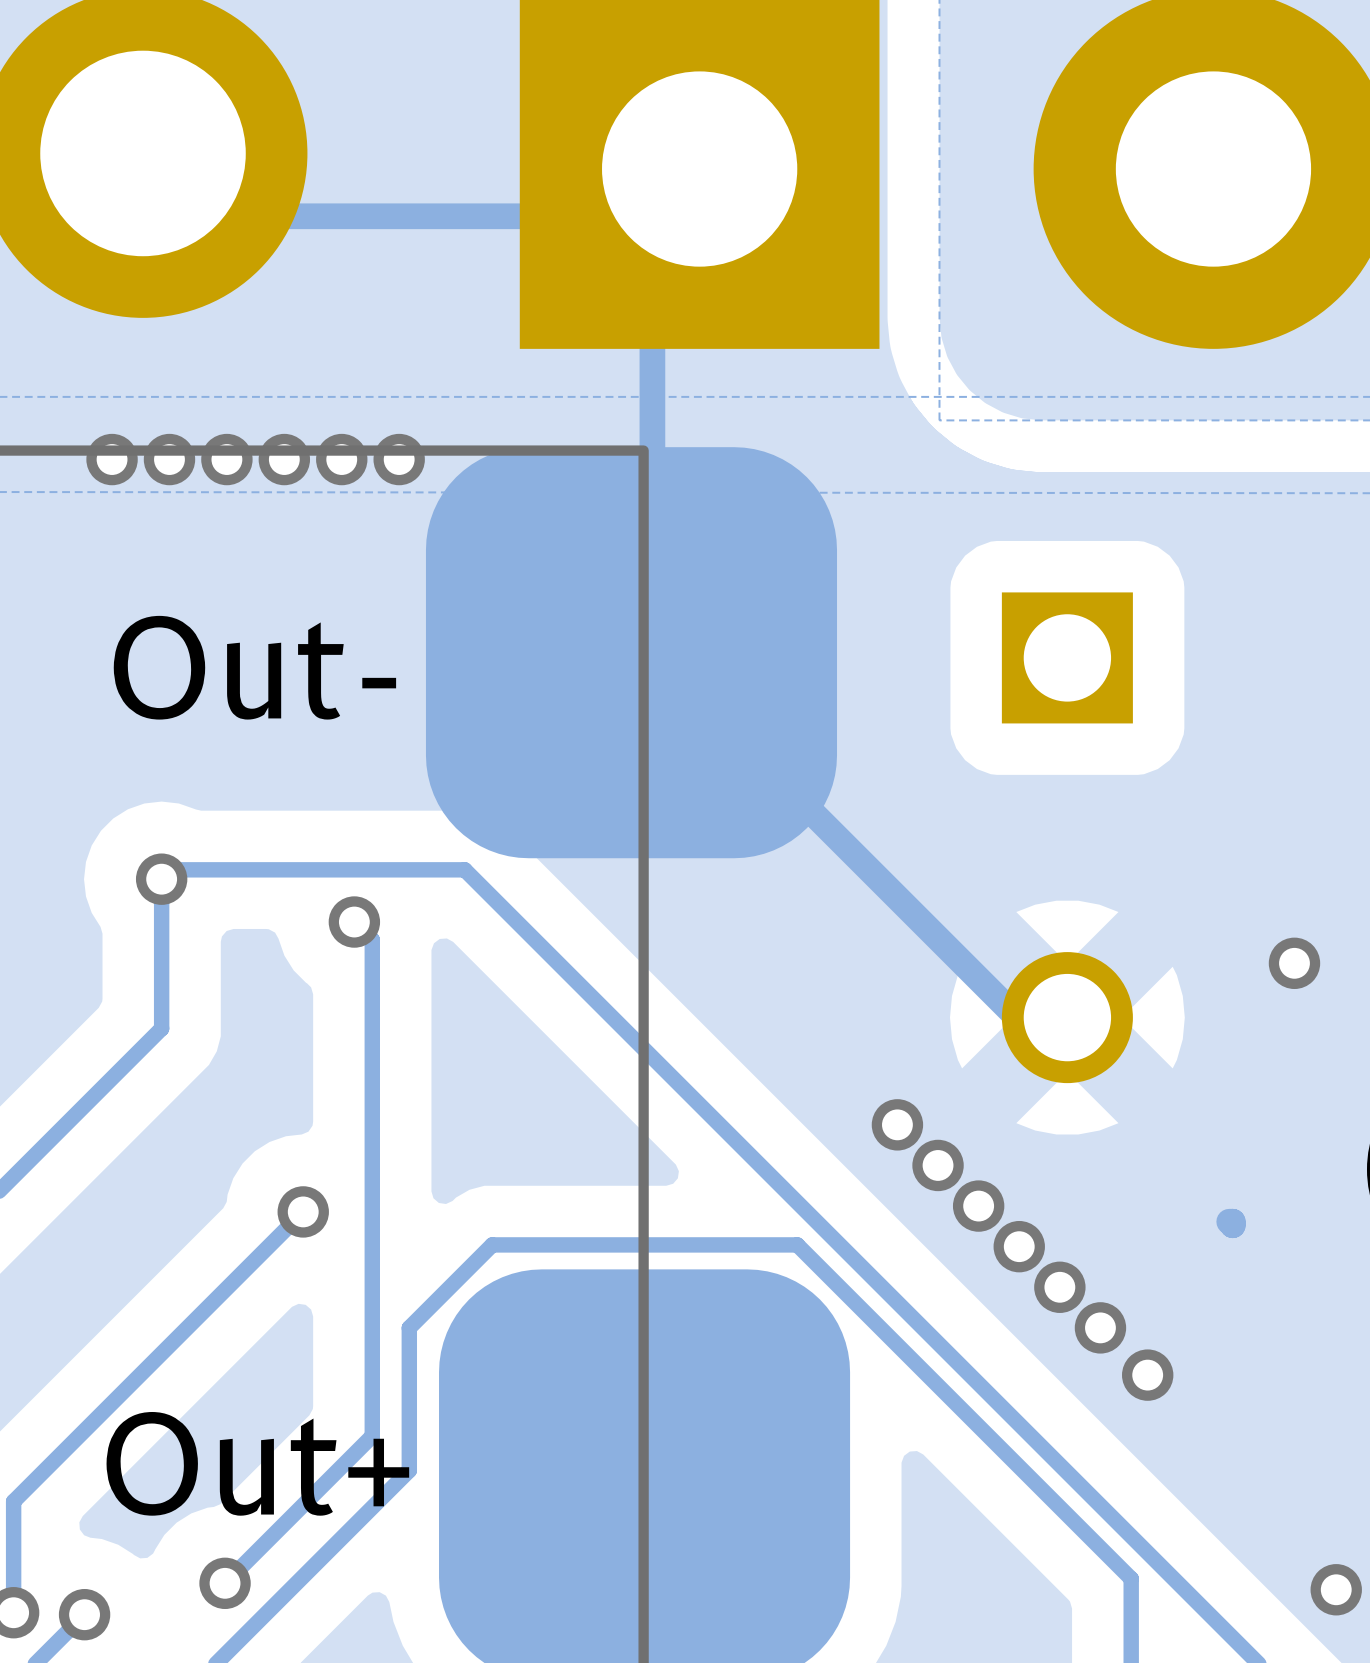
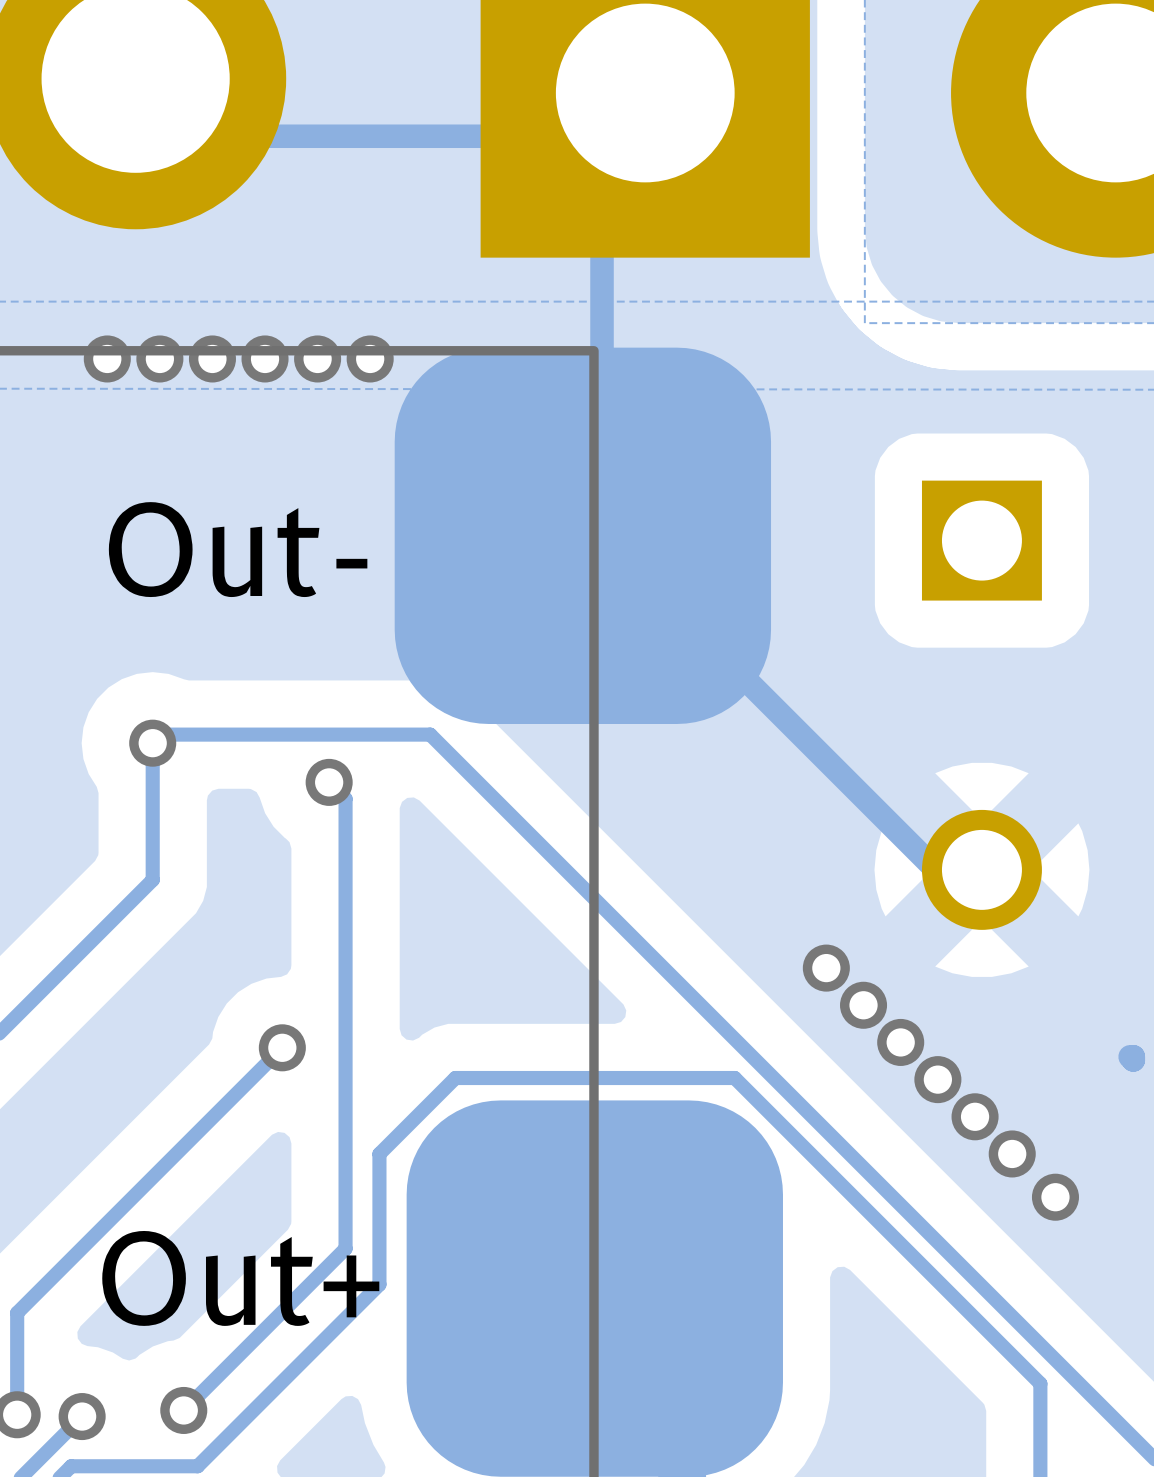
track: (372, 1431) (372, 1436) (225, 1583) -> (345, 1248) (183, 1410)
via position: (225, 1583) -> (183, 1410)

